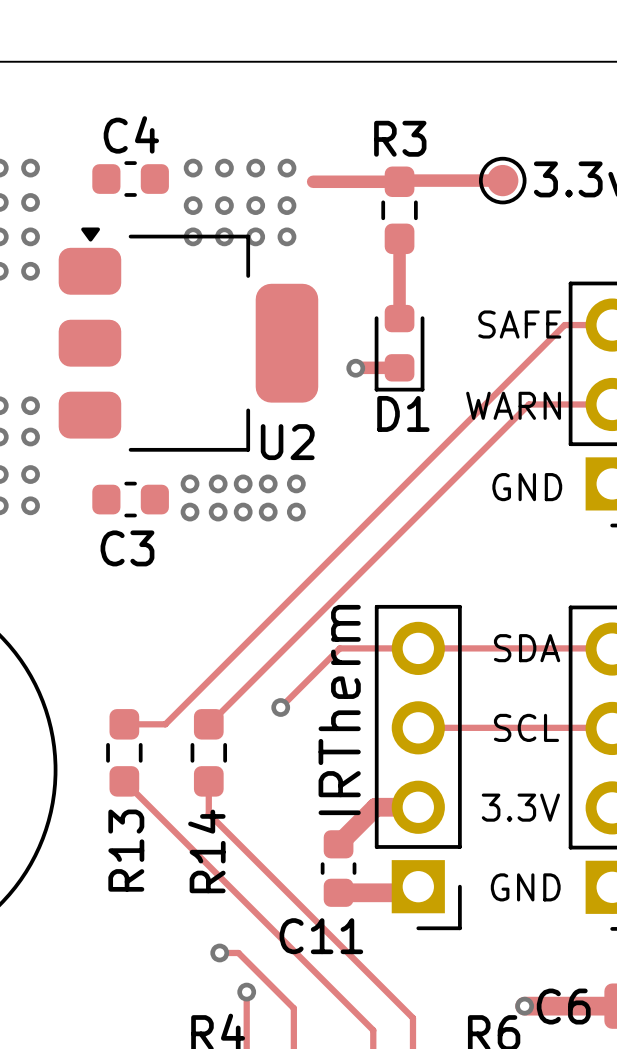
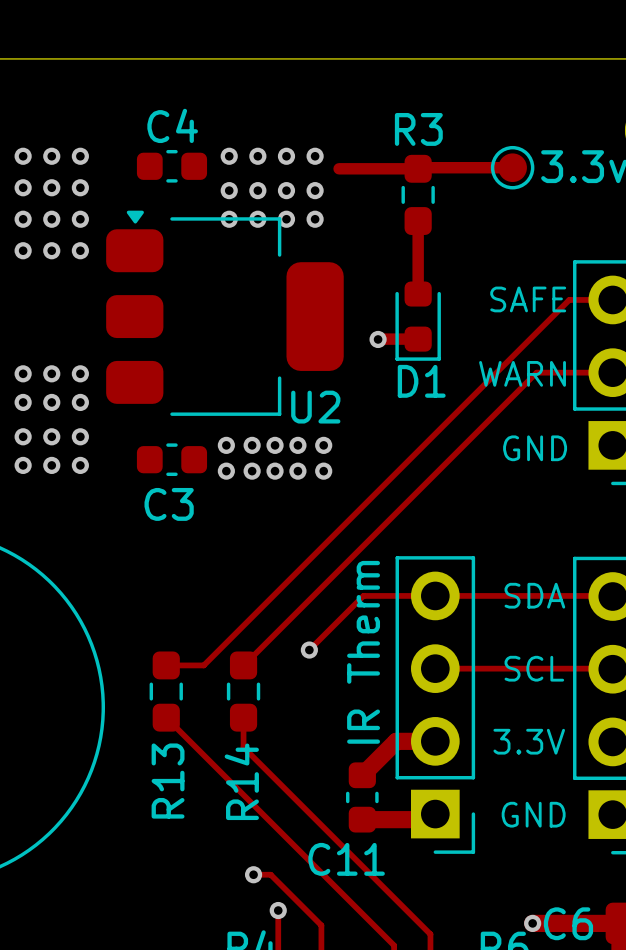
part value: IRTherm (339, 710) -> IR Therm (363, 652)

